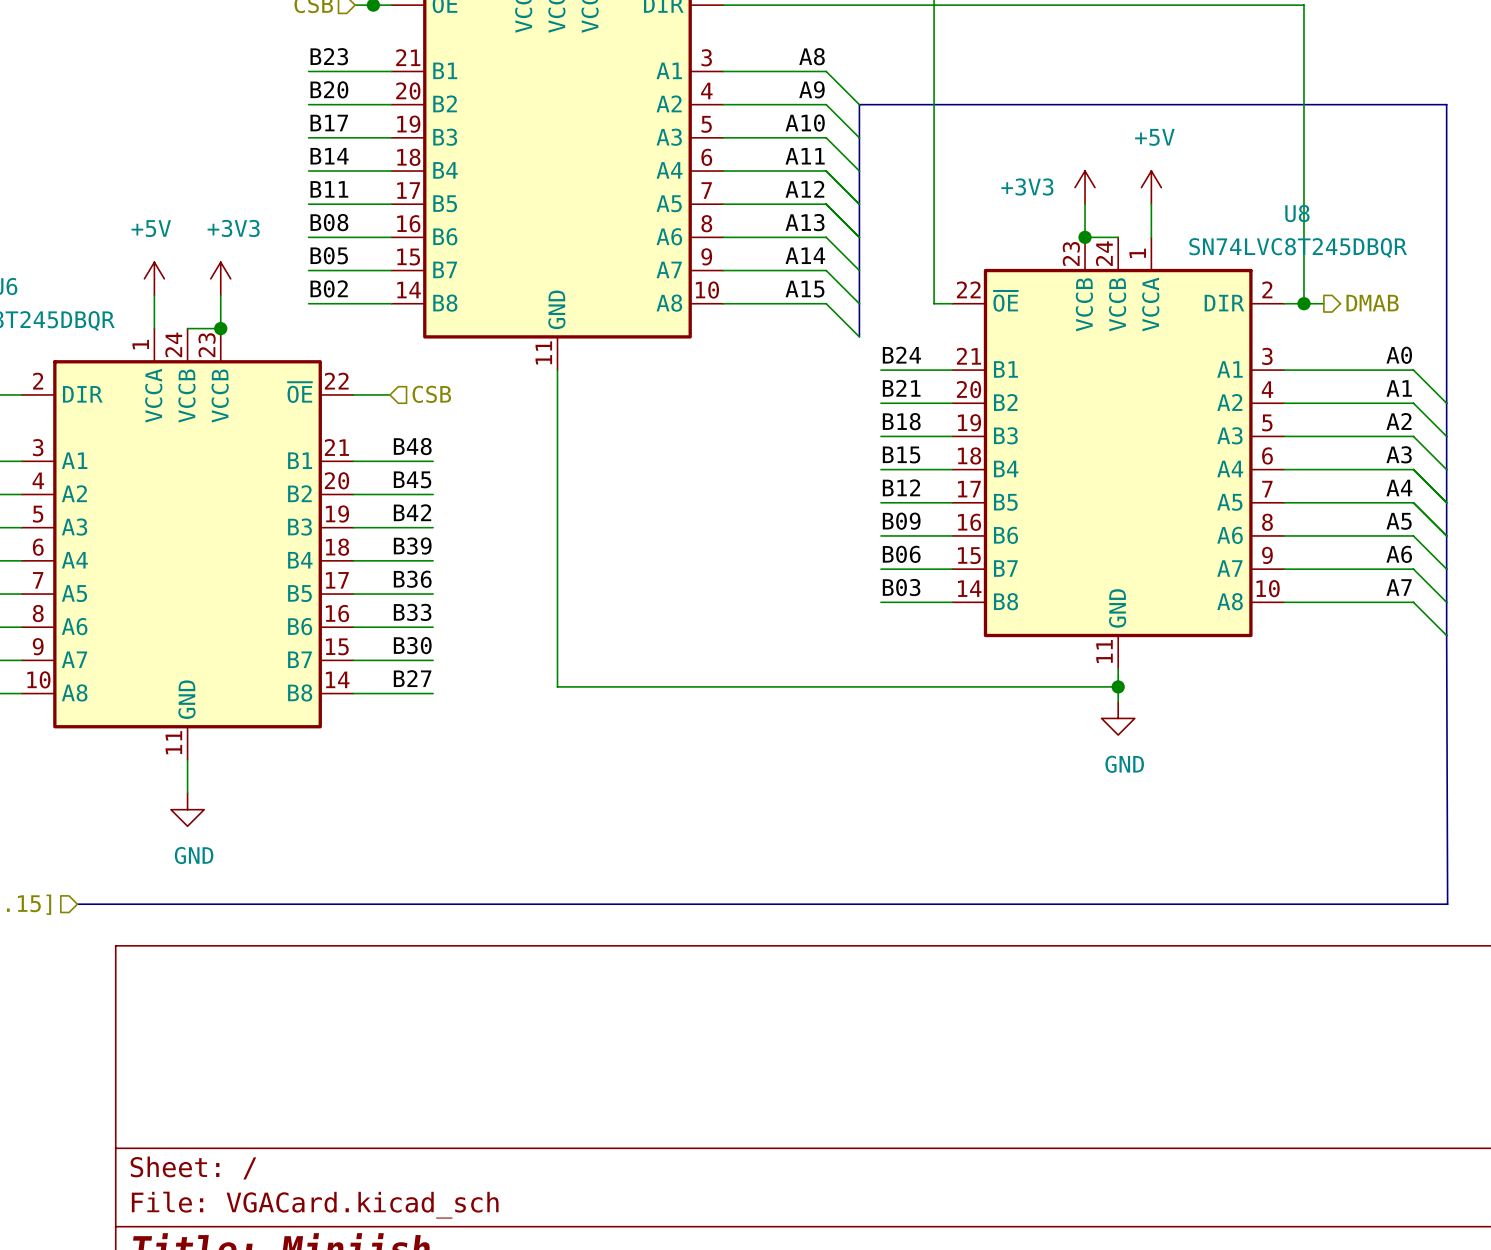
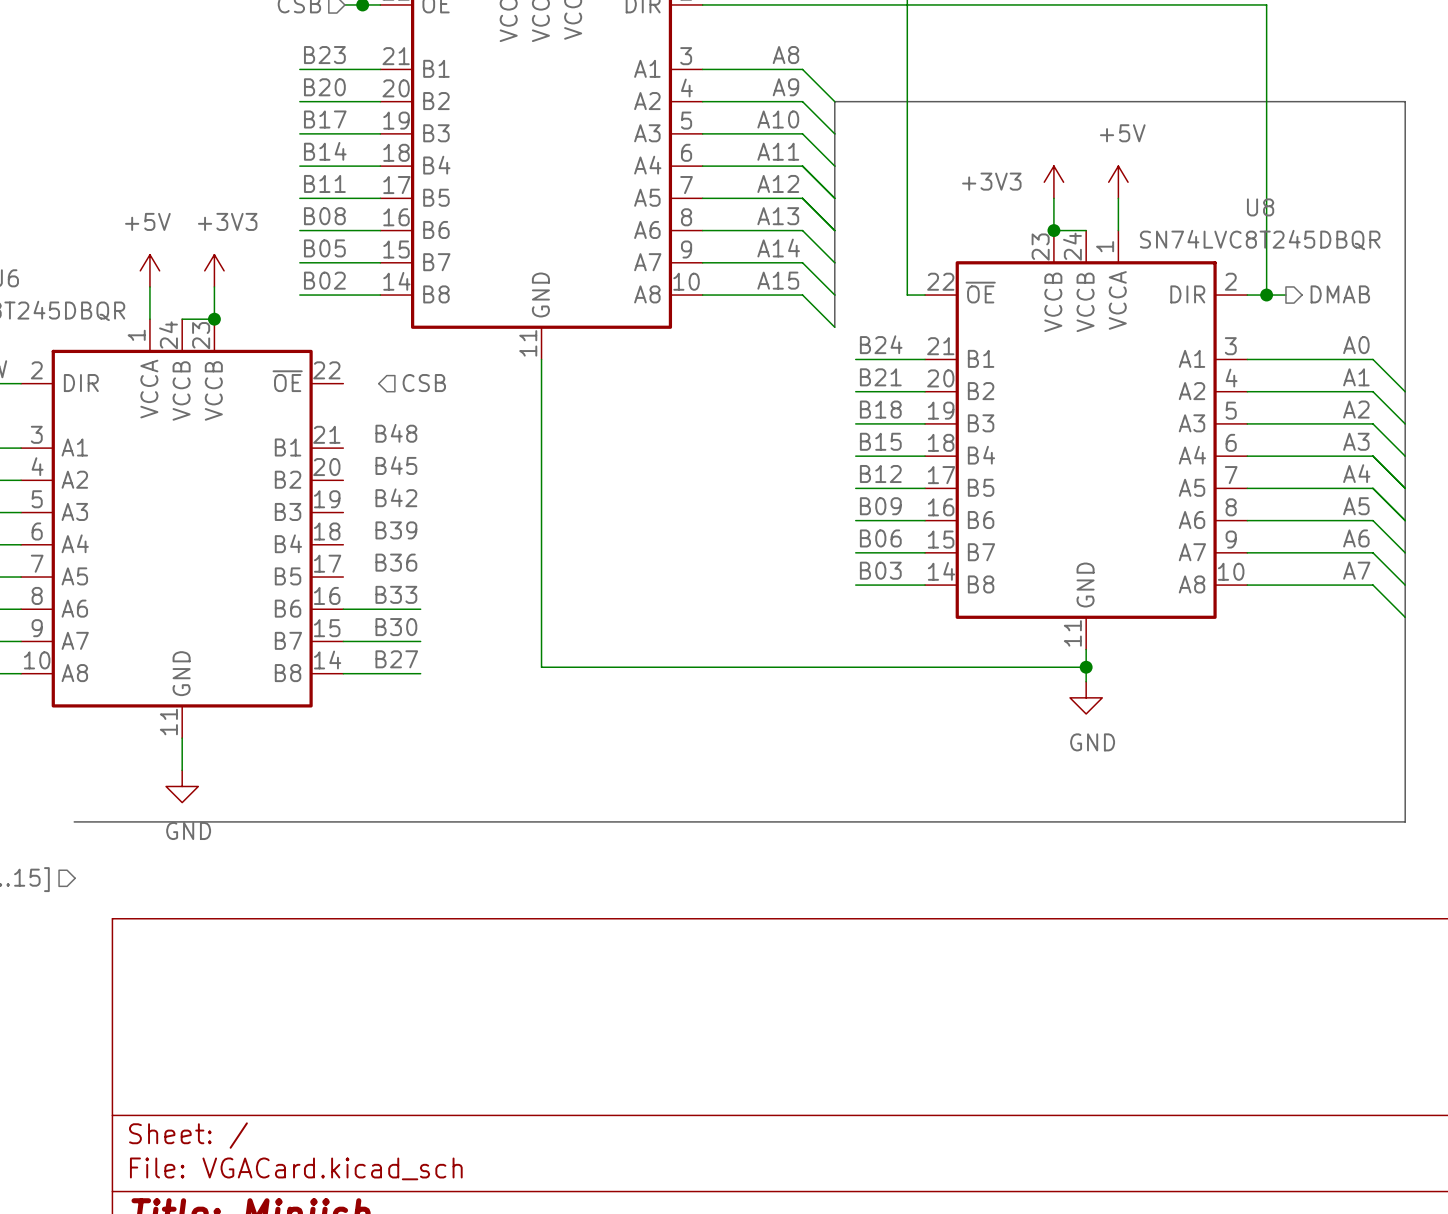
wire: (353, 394) (389, 394) -> none
wire: (353, 461) (433, 461) -> none
wire: (353, 494) (433, 494) -> none
wire: (353, 527) (433, 527) -> none
wire: (353, 560) (433, 560) -> none
wire: (353, 594) (433, 594) -> none
bus: (1446, 635) (1447, 904) (77, 904) -> (1405, 617) (1405, 821) (74, 821)

